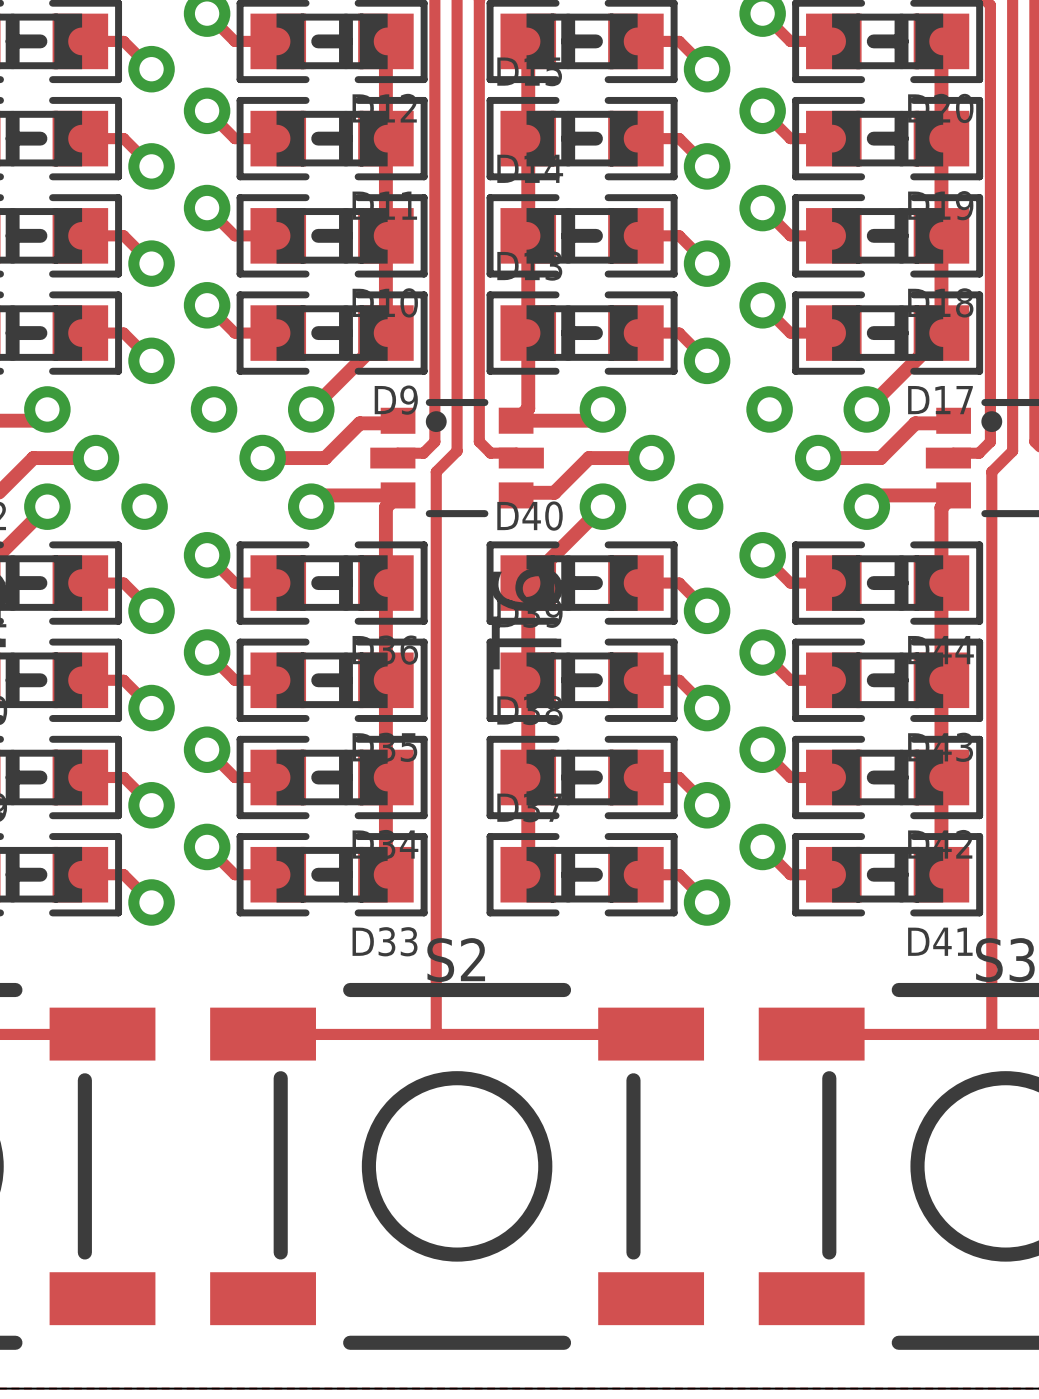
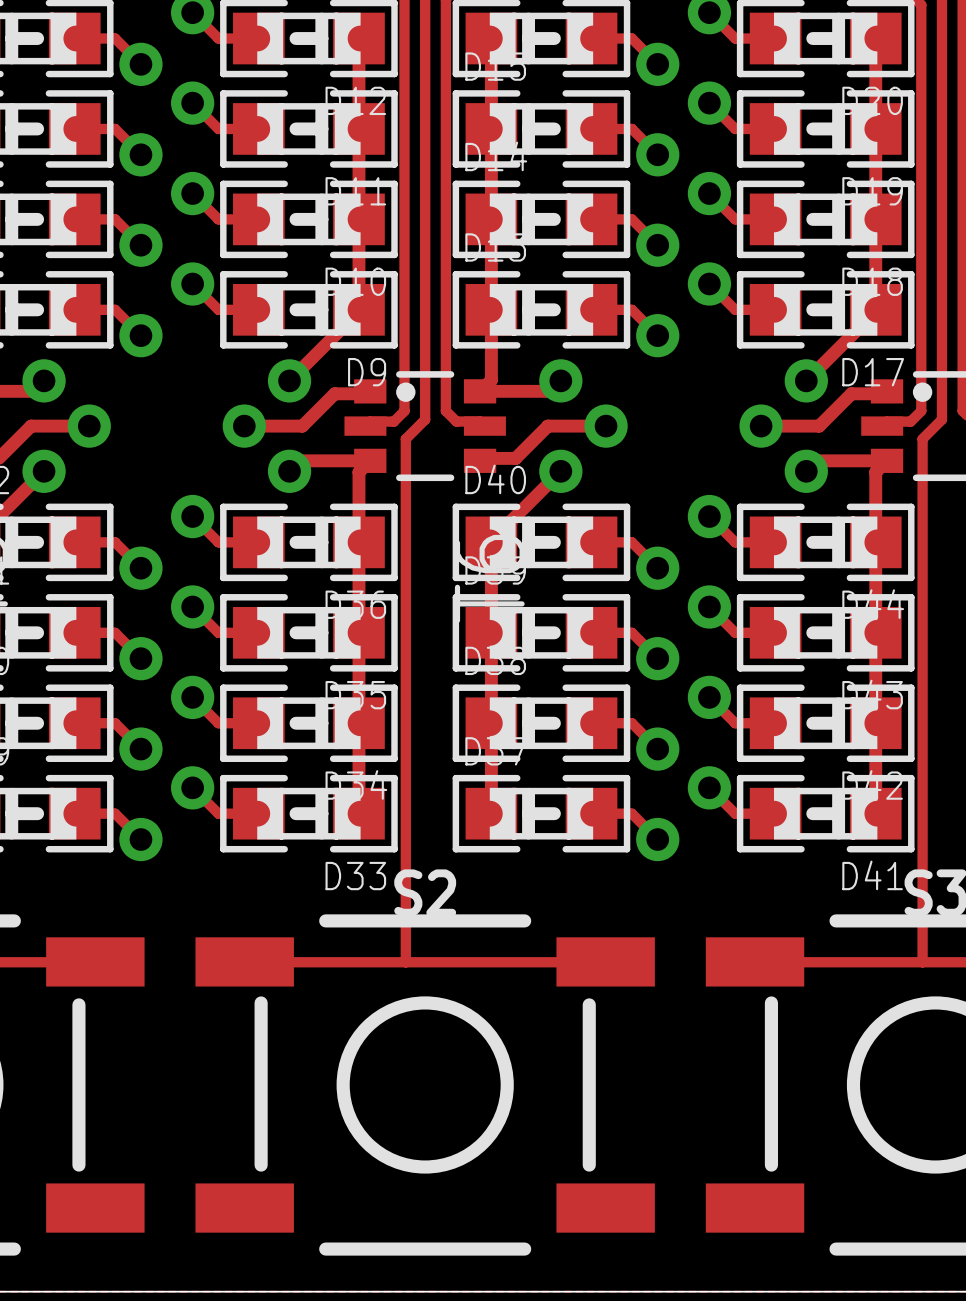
via: (214, 409) -> none
via: (769, 409) -> none
via: (144, 506) -> none
via: (700, 506) -> none

